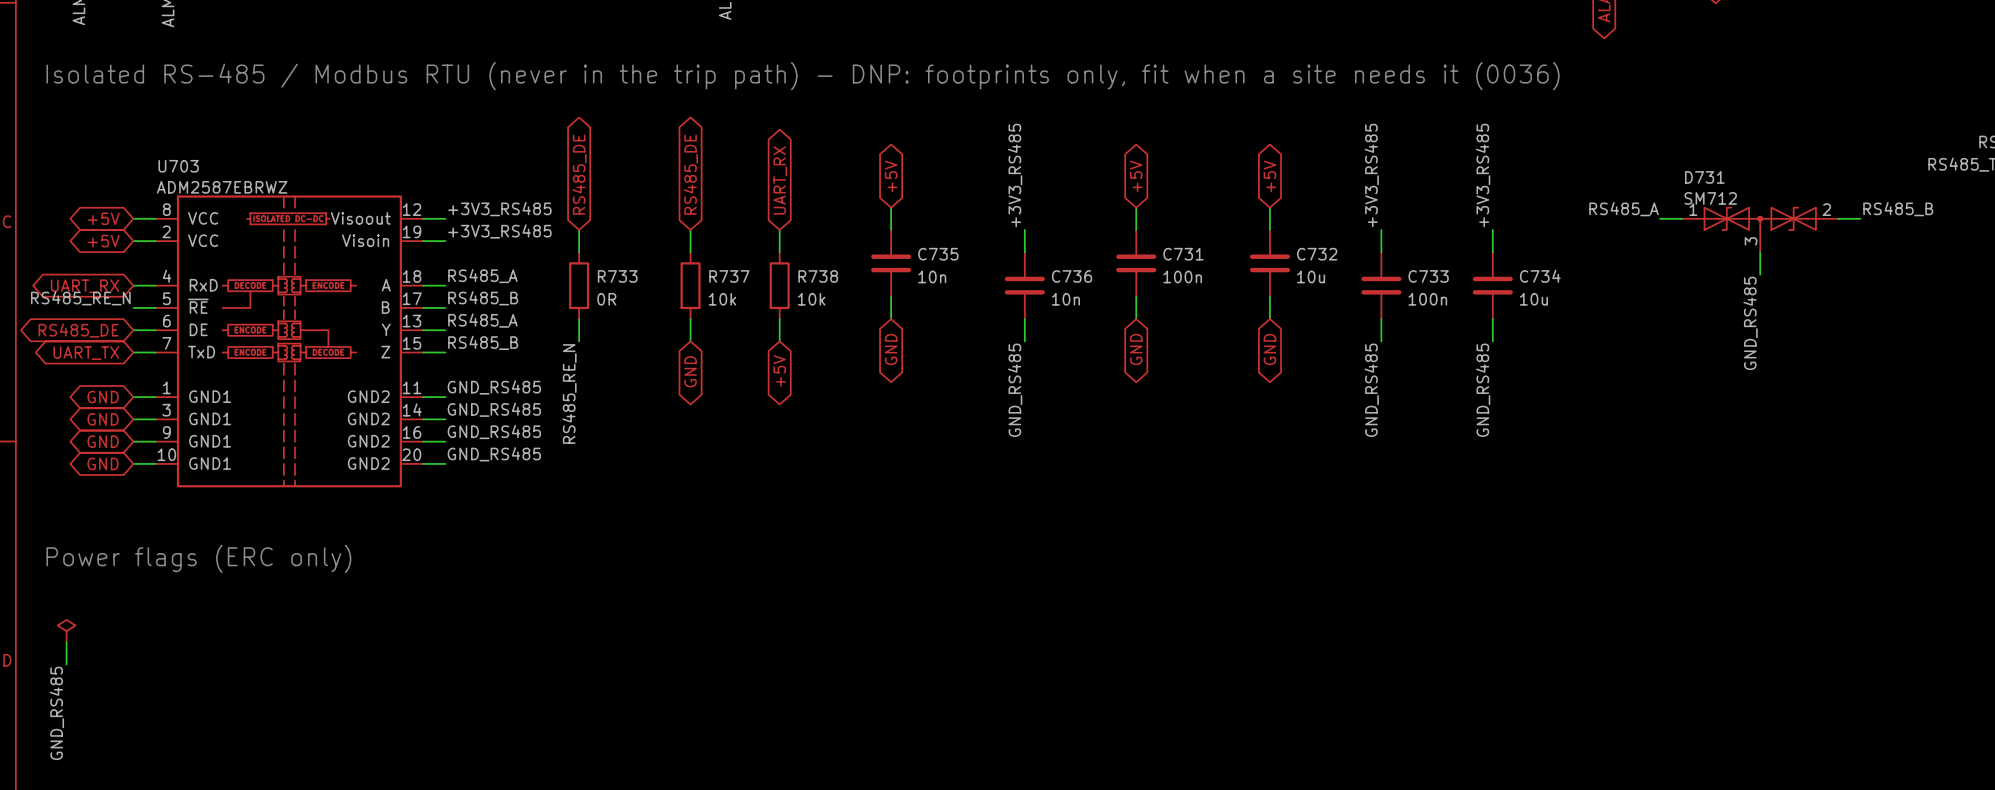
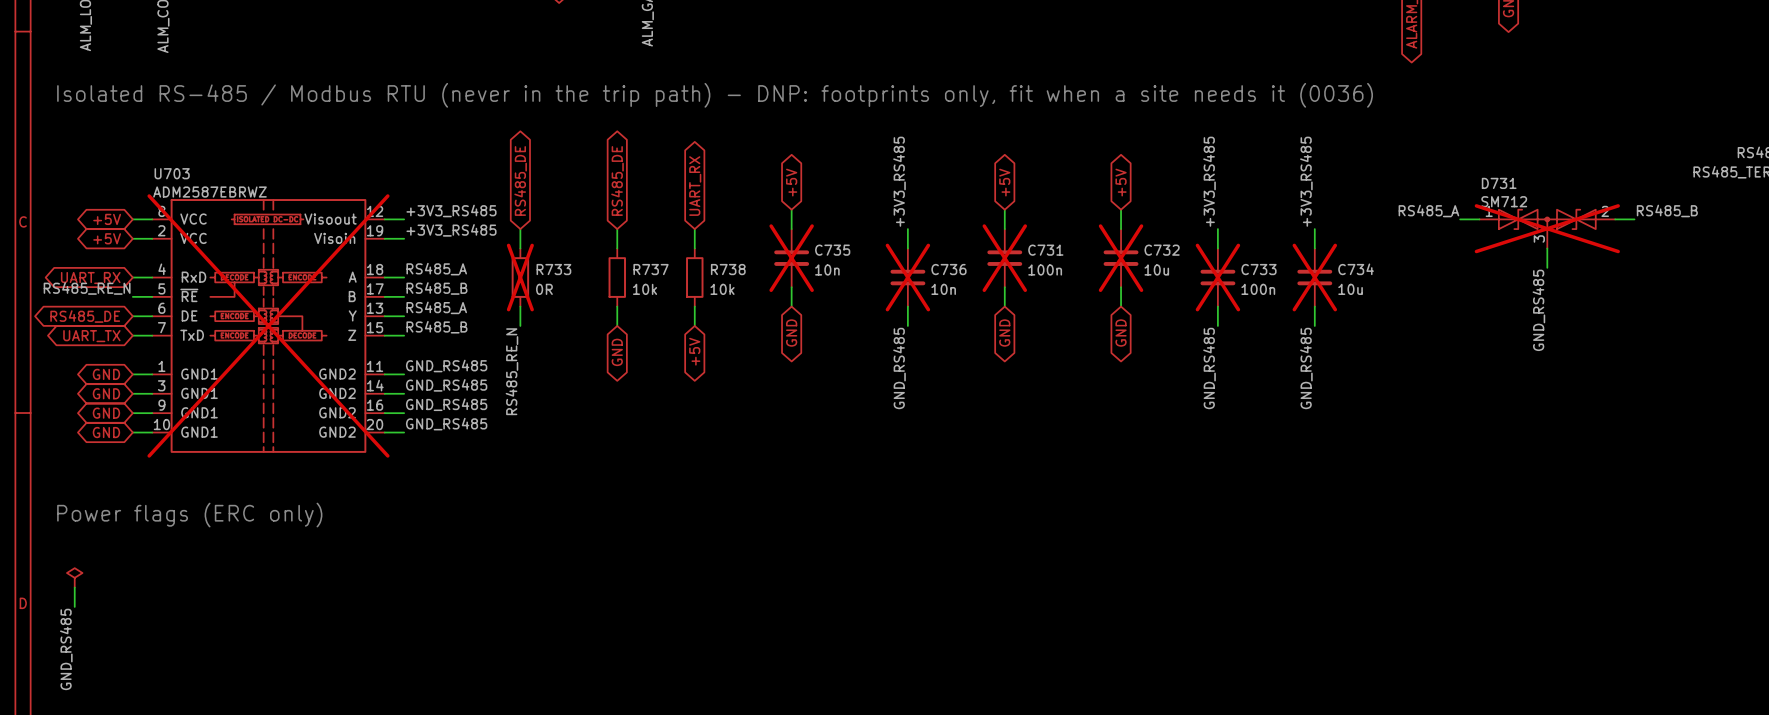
D731 do-not-place cross: none -> (1547, 228)
C735 do-not-place cross: none -> (791, 258)
C731 do-not-place cross: none -> (1004, 258)
C732 do-not-place cross: none -> (1121, 258)
R733 do-not-place cross: none -> (520, 277)
C736 do-not-place cross: none -> (907, 277)
C733 do-not-place cross: none -> (1217, 277)
C734 do-not-place cross: none -> (1314, 277)
U703 do-not-place cross: none -> (268, 325)

